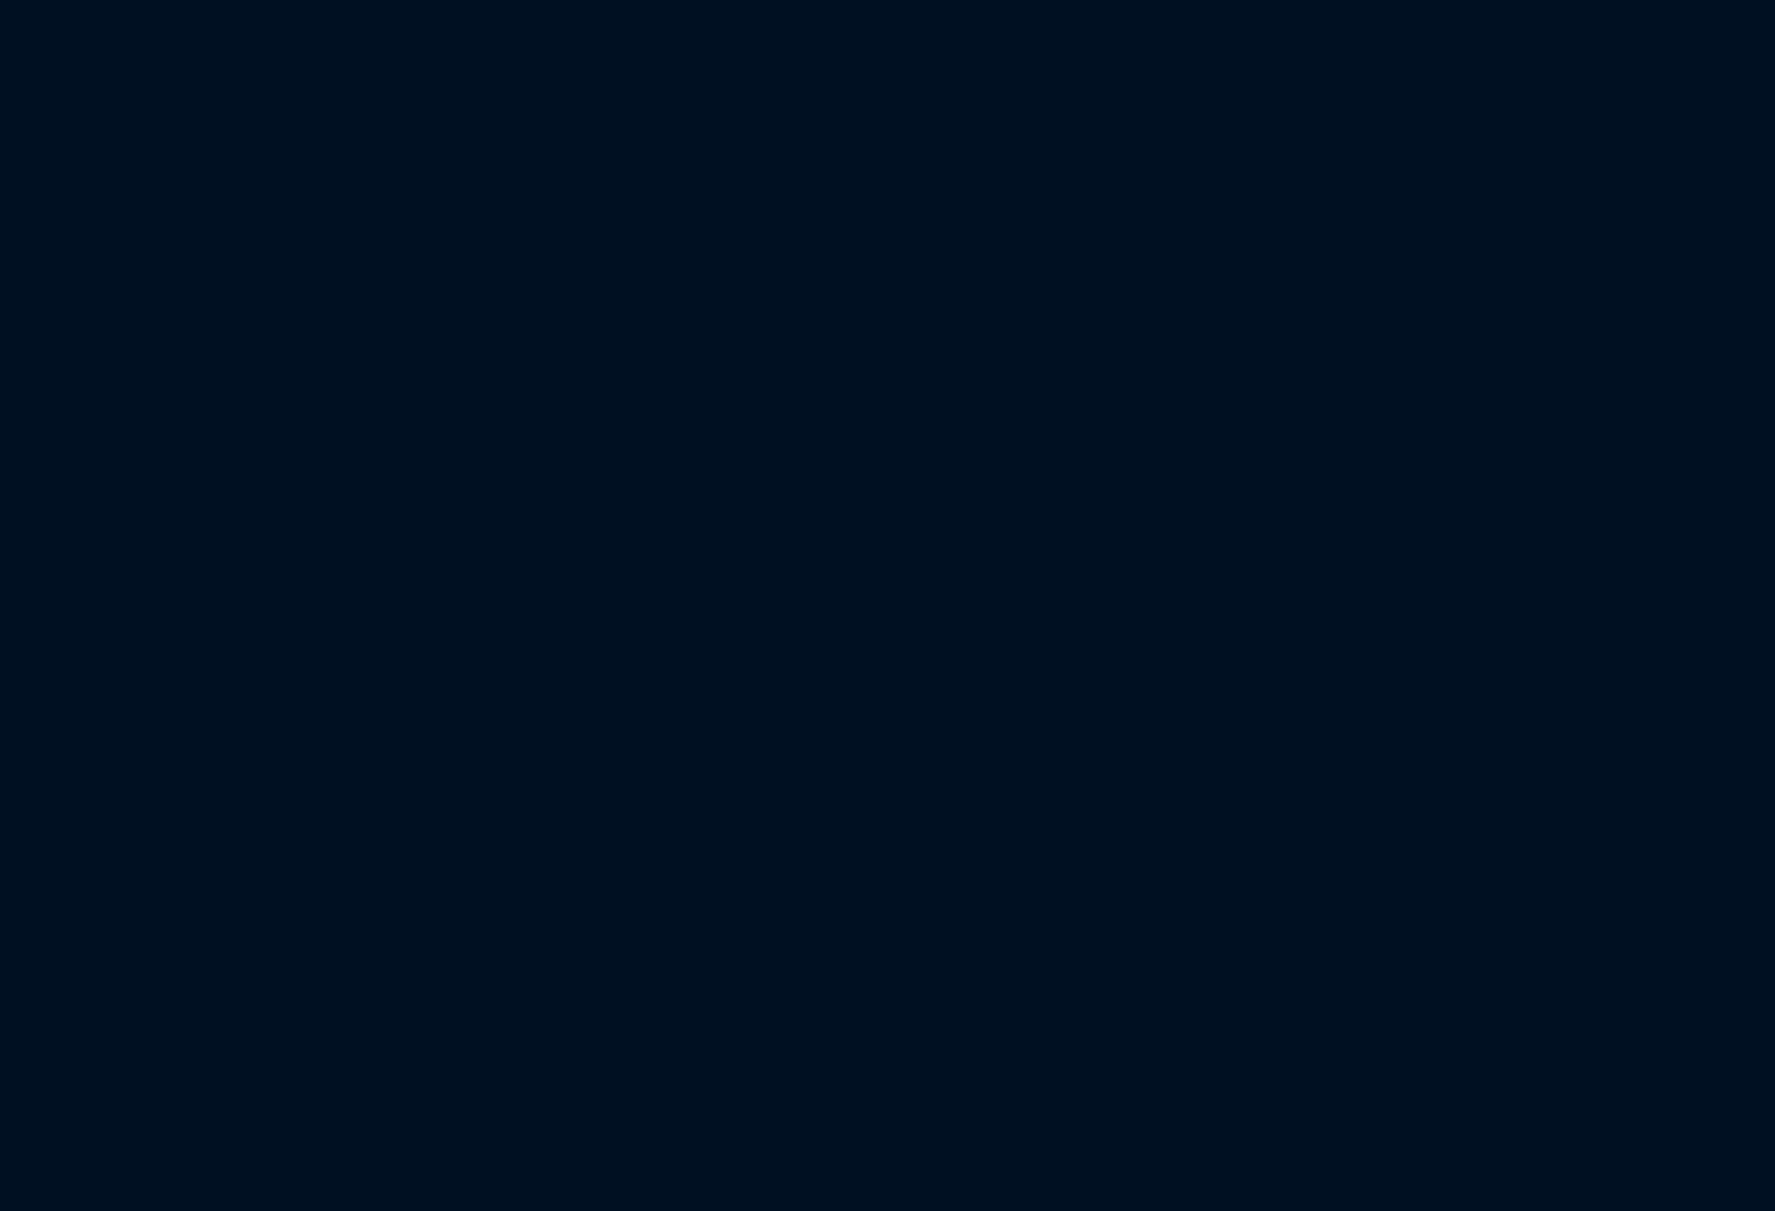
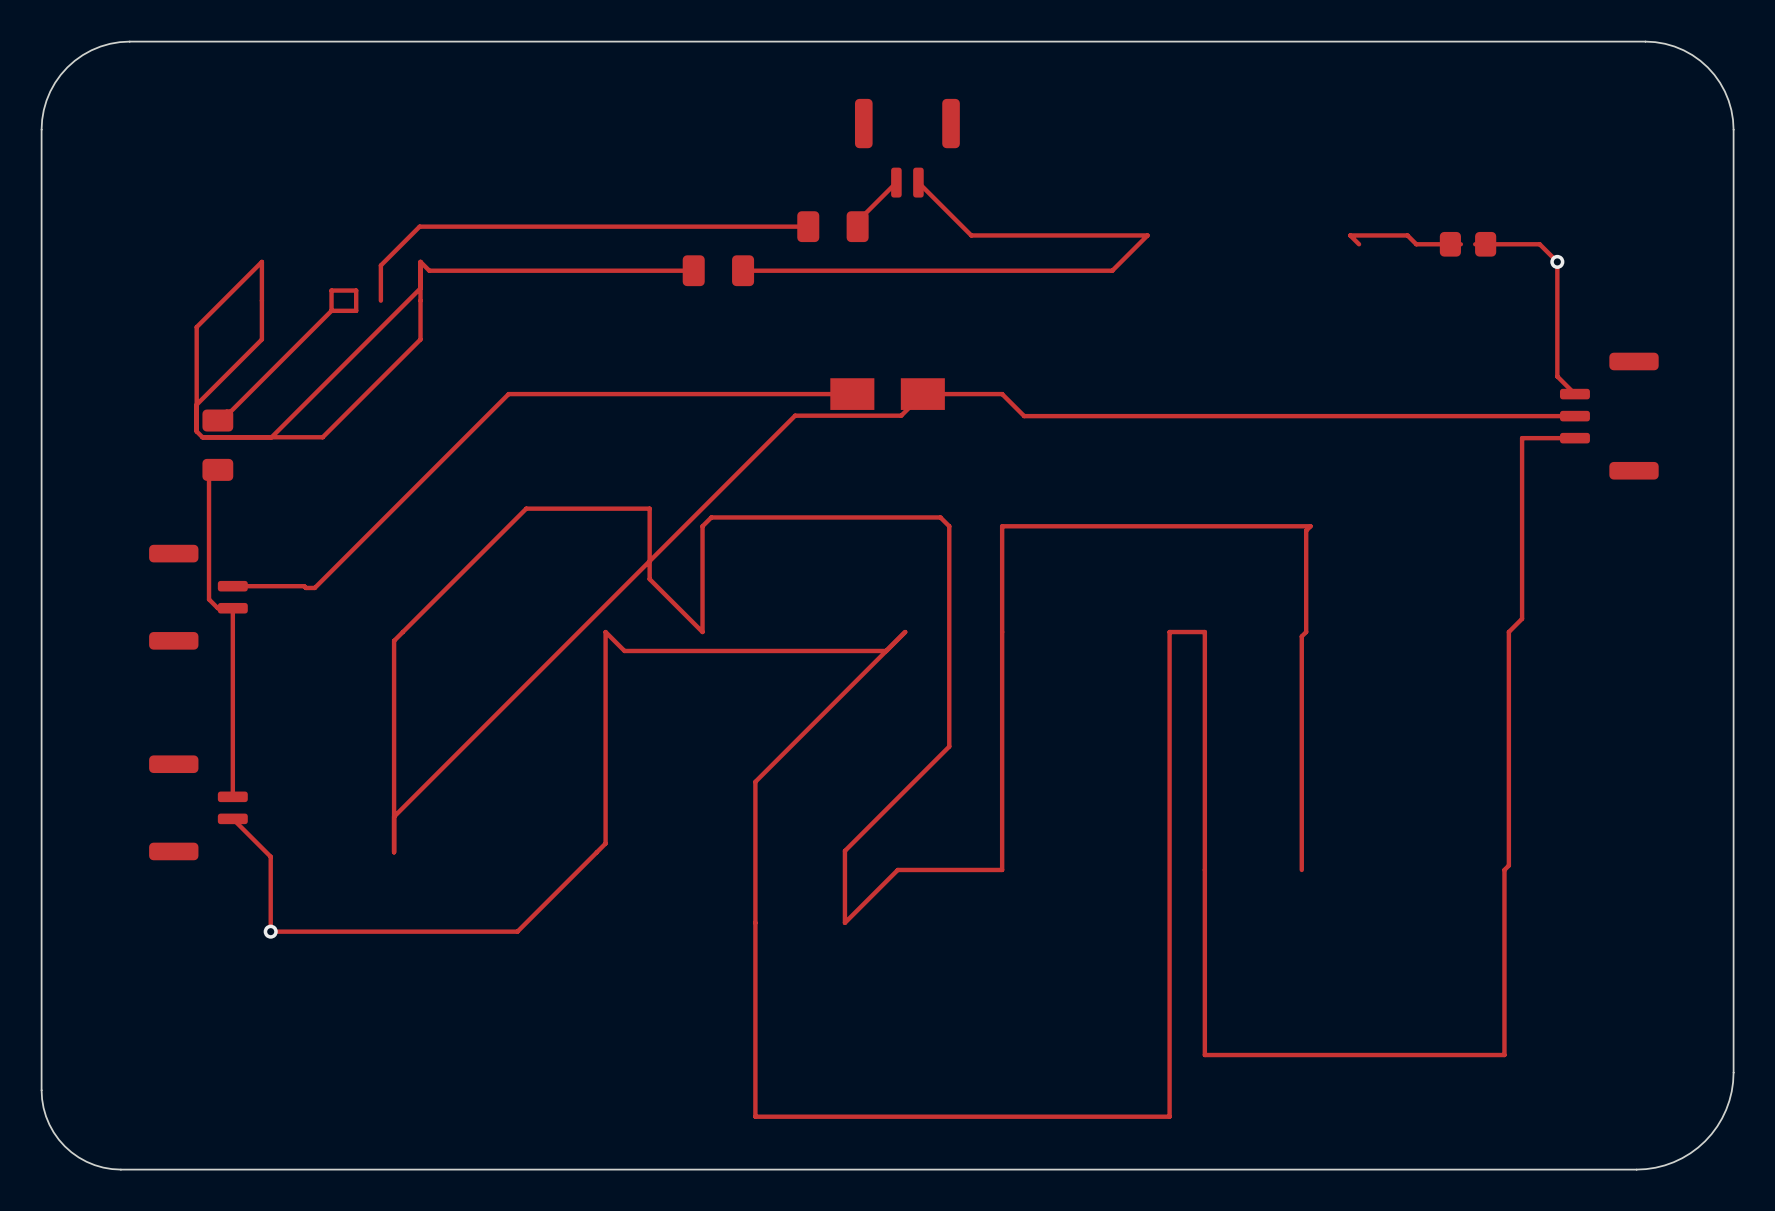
board edge: none -> (1645, 41) (129, 41) (100, 46) (82, 55) (67, 67) (50, 91) (43, 110) (41, 129) (41, 1090) (46, 1116) (53, 1132) (64, 1146) (78, 1157) (94, 1165) (120, 1169) (1636, 1169) (1664, 1165) (1690, 1153) (1711, 1134) (1722, 1118) (1731, 1091) (1733, 1072) (1733, 129) (1731, 110) (1724, 91) (1707, 67) (1683, 50) (1665, 43) (1645, 41)
part: none -> (907, 148)
top track: none -> (896, 182) (857, 221) (857, 226)
top track: none -> (918, 182) (971, 235) (1147, 235) (1112, 270) (743, 270)
top track: none -> (808, 226) (419, 226) (380, 265) (380, 300)
part: none -> (832, 226)
top track: none -> (1460, 244) (1416, 244) (1407, 235) (1350, 235) (1359, 244)
part: none -> (1468, 244)
top track: none -> (1475, 244) (1539, 244) (1557, 261) (1557, 376) (1574, 394)
via: none -> (1557, 261)
top track: none -> (693, 270) (429, 270) (420, 261) (420, 339) (322, 437) (202, 437) (196, 431) (196, 327) (261, 261) (261, 339) (196, 404)
part: none -> (718, 270)
top track: none -> (420, 288) (271, 437)
top track: none -> (331, 310) (230, 411) (226, 411) (217, 420)
top track: none -> (331, 310) (331, 290) (356, 290) (356, 310) (331, 310)
top track: none -> (852, 394) (508, 394) (314, 587) (304, 586) (232, 586)
part: none -> (887, 394)
top track: none -> (1574, 416) (1024, 416) (1002, 394) (922, 394) (901, 415) (795, 415) (394, 816)
part: none -> (1609, 416)
top track: none -> (1574, 438) (1522, 438) (1522, 618) (1508, 632) (1508, 865) (1504, 869) (1504, 1055) (1204, 1055) (1204, 632) (1169, 632) (1169, 1116) (755, 1116) (755, 781) (905, 632)
part: none -> (217, 445)
top track: none -> (217, 469) (209, 478) (209, 599) (217, 608) (232, 608) (232, 796)
part: none -> (198, 597)
top track: none -> (886, 650) (624, 650) (605, 632) (605, 843) (517, 931) (270, 931) (270, 856) (232, 818)
part: none -> (198, 807)
top track: none -> (394, 852) (394, 640) (526, 508) (649, 508) (649, 579) (702, 632) (702, 526) (711, 517) (940, 517) (949, 526) (949, 746) (844, 850) (844, 922) (897, 869) (1002, 869) (1002, 526) (1310, 526) (1306, 530) (1306, 632) (1301, 636) (1301, 869)
via: none -> (270, 931)

